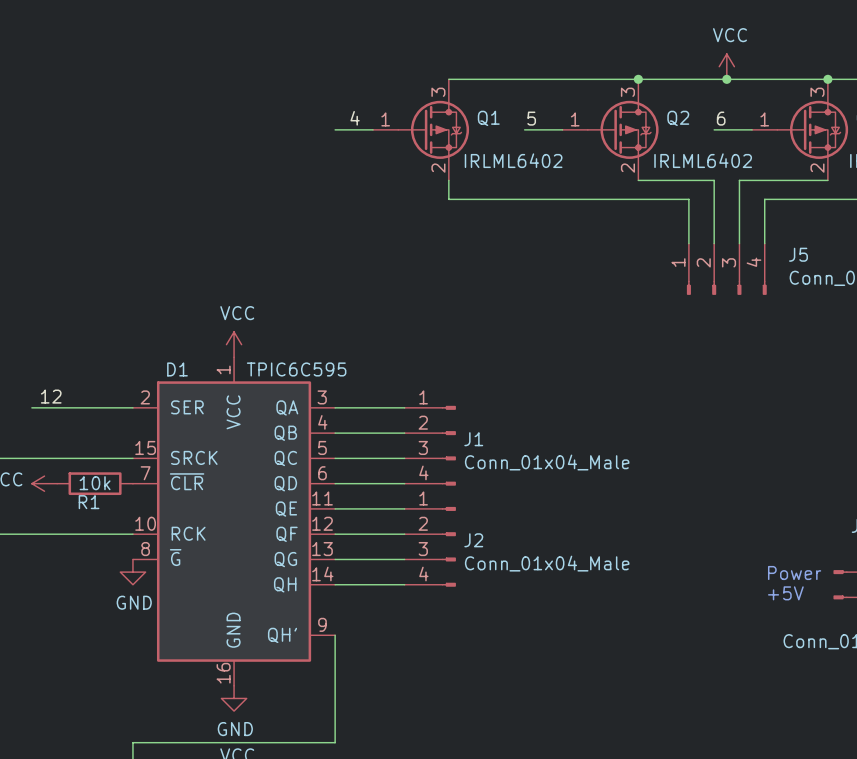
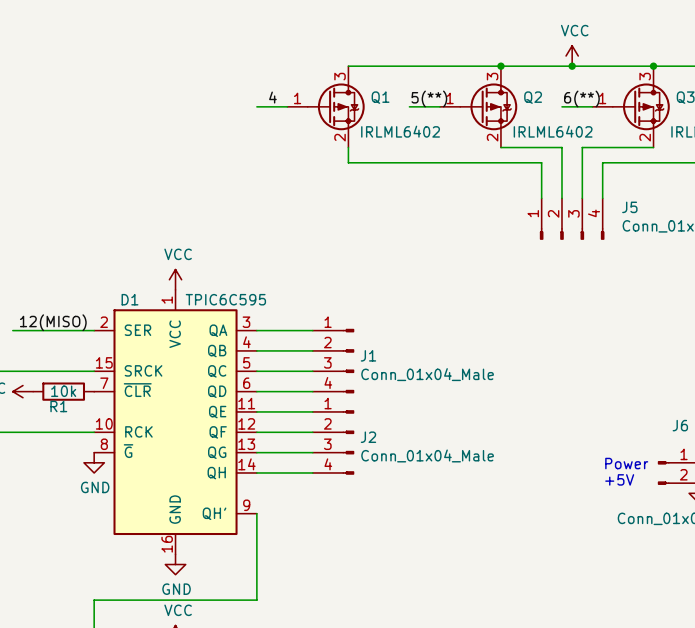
label: 5 (531, 118) -> 5(**) (429, 98)
label: 6 (721, 118) -> 6(**) (581, 98)
label: 12 (51, 396) -> 12(MISO) (53, 322)

